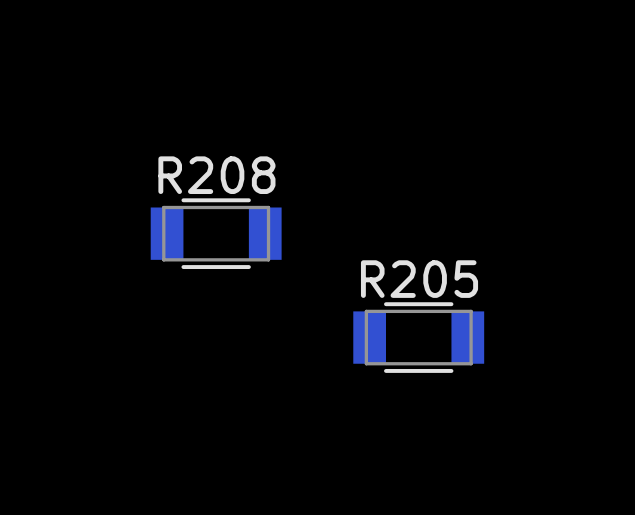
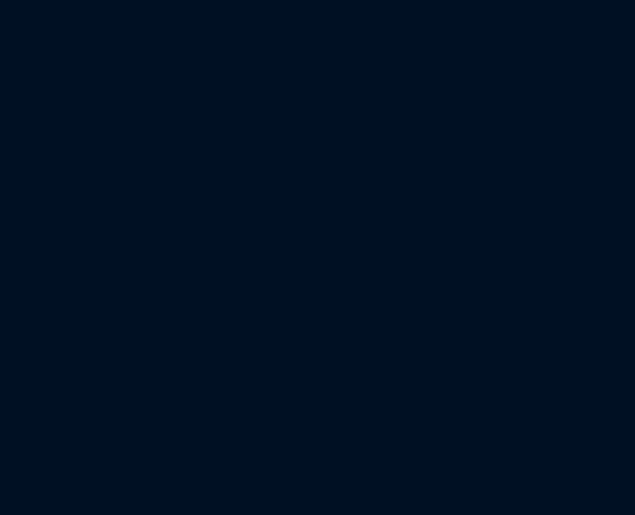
R208: (216, 233) -> none
R205: (418, 337) -> none

